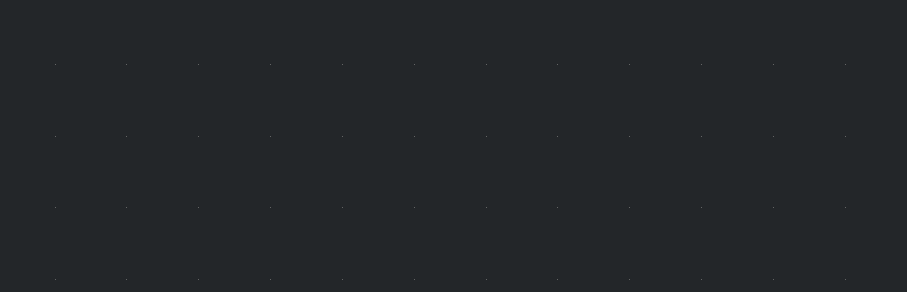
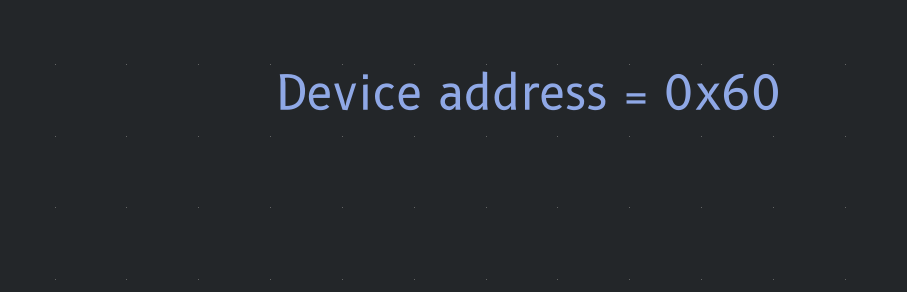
text: none -> Device address = 0x60 (528, 90)

